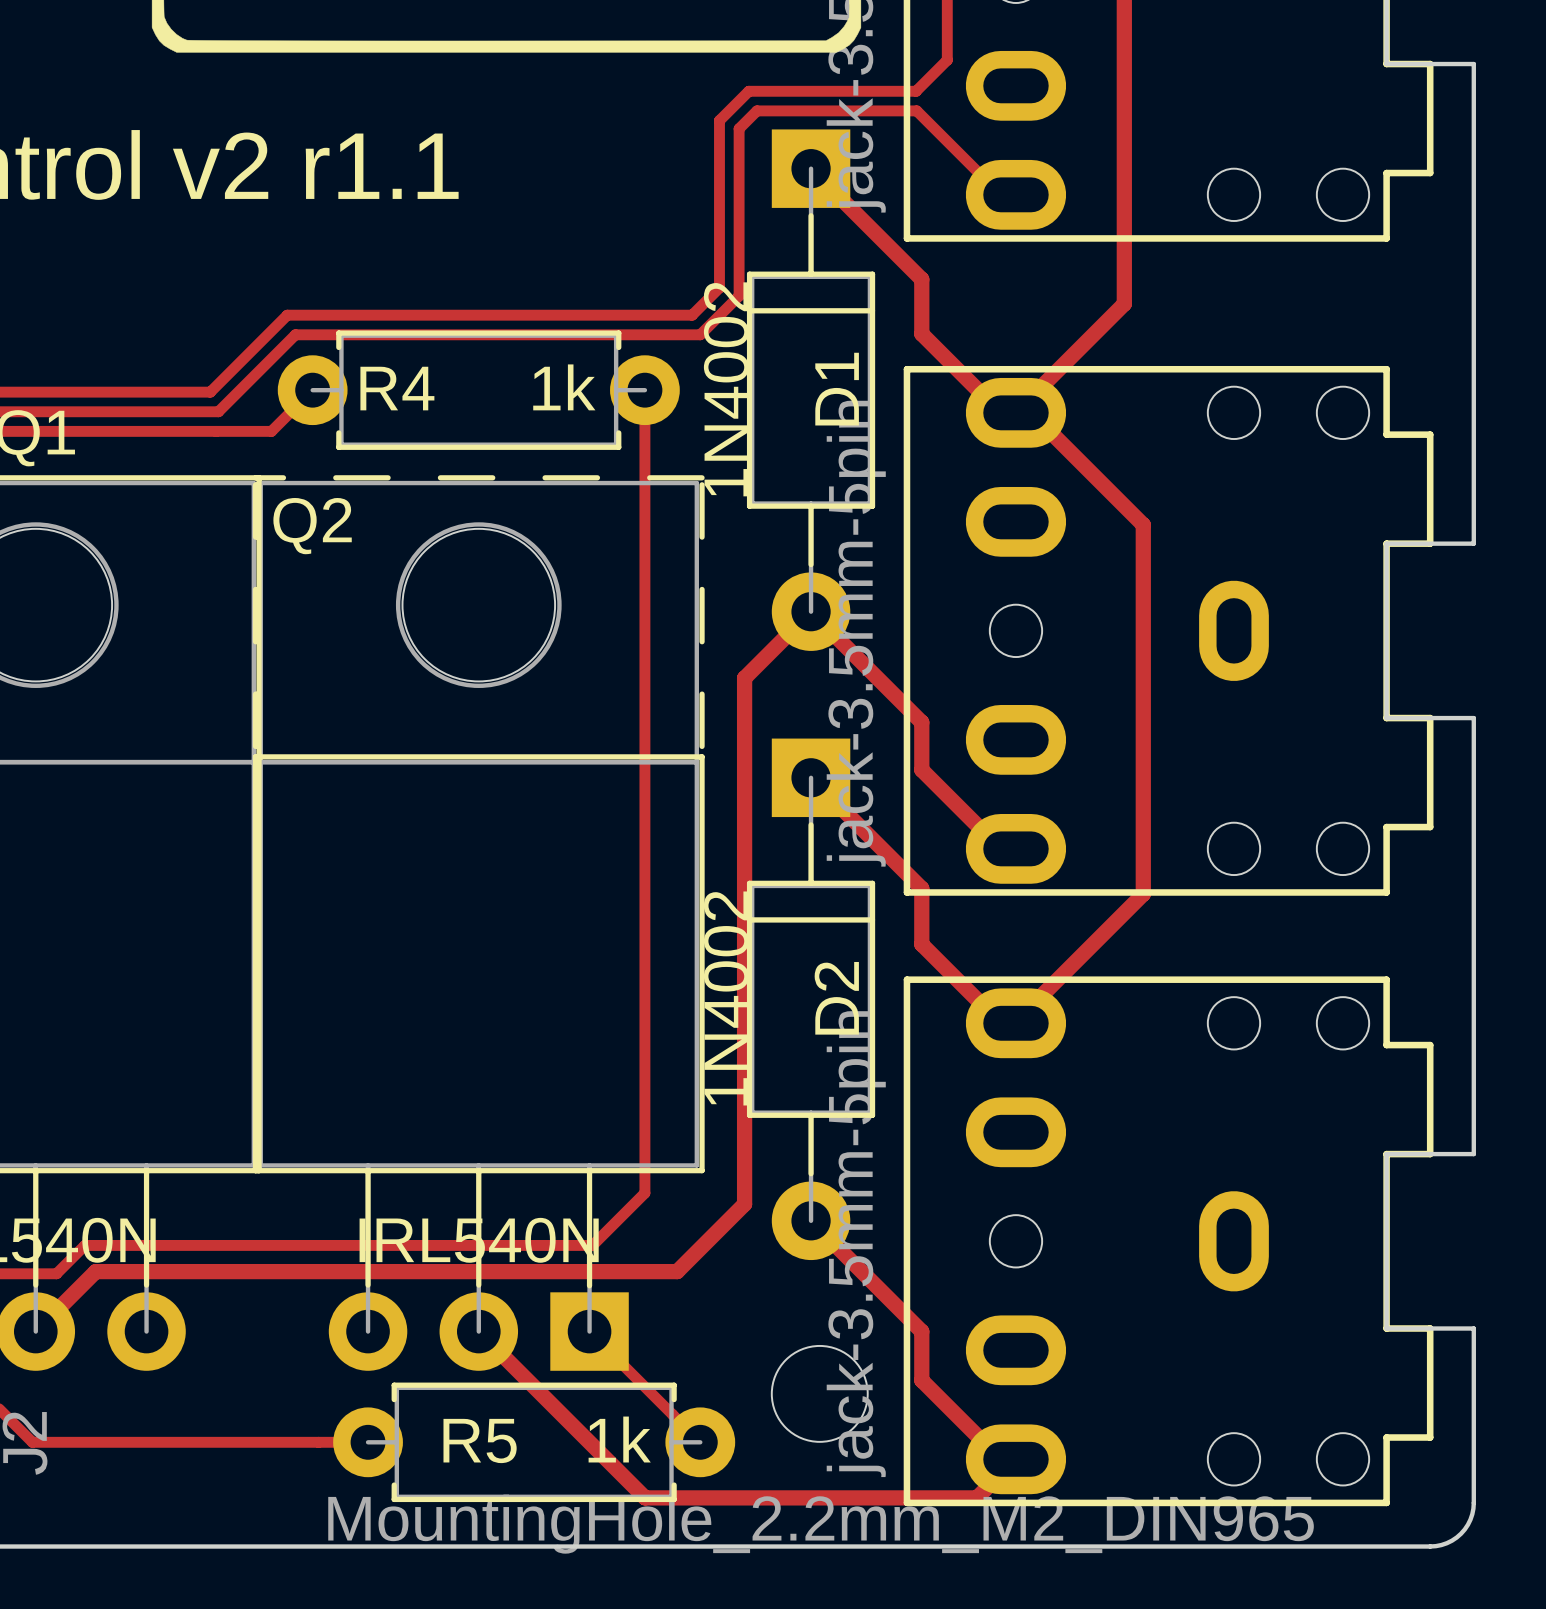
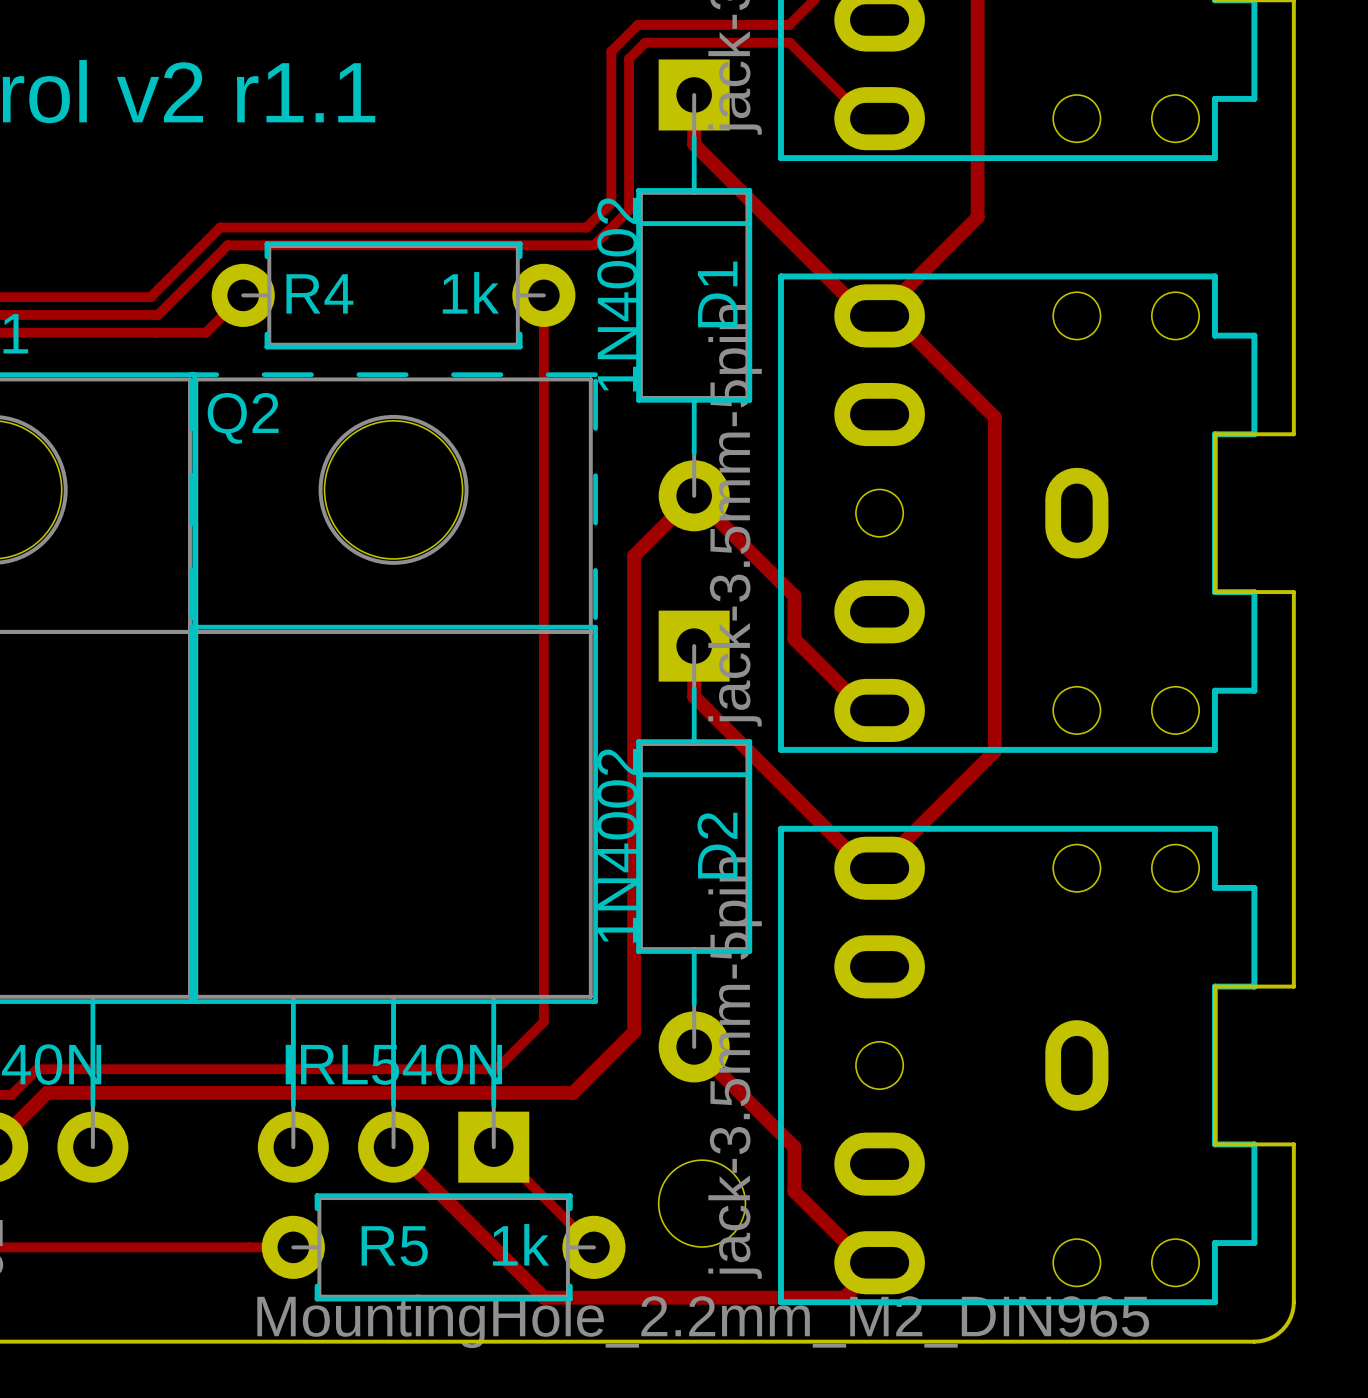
track: (811, 168) (921, 279) (921, 333) -> (694, 94) (694, 144) (794, 244)
track: (811, 777) (921, 888) (921, 944) -> (694, 646) (694, 696) (794, 796)

